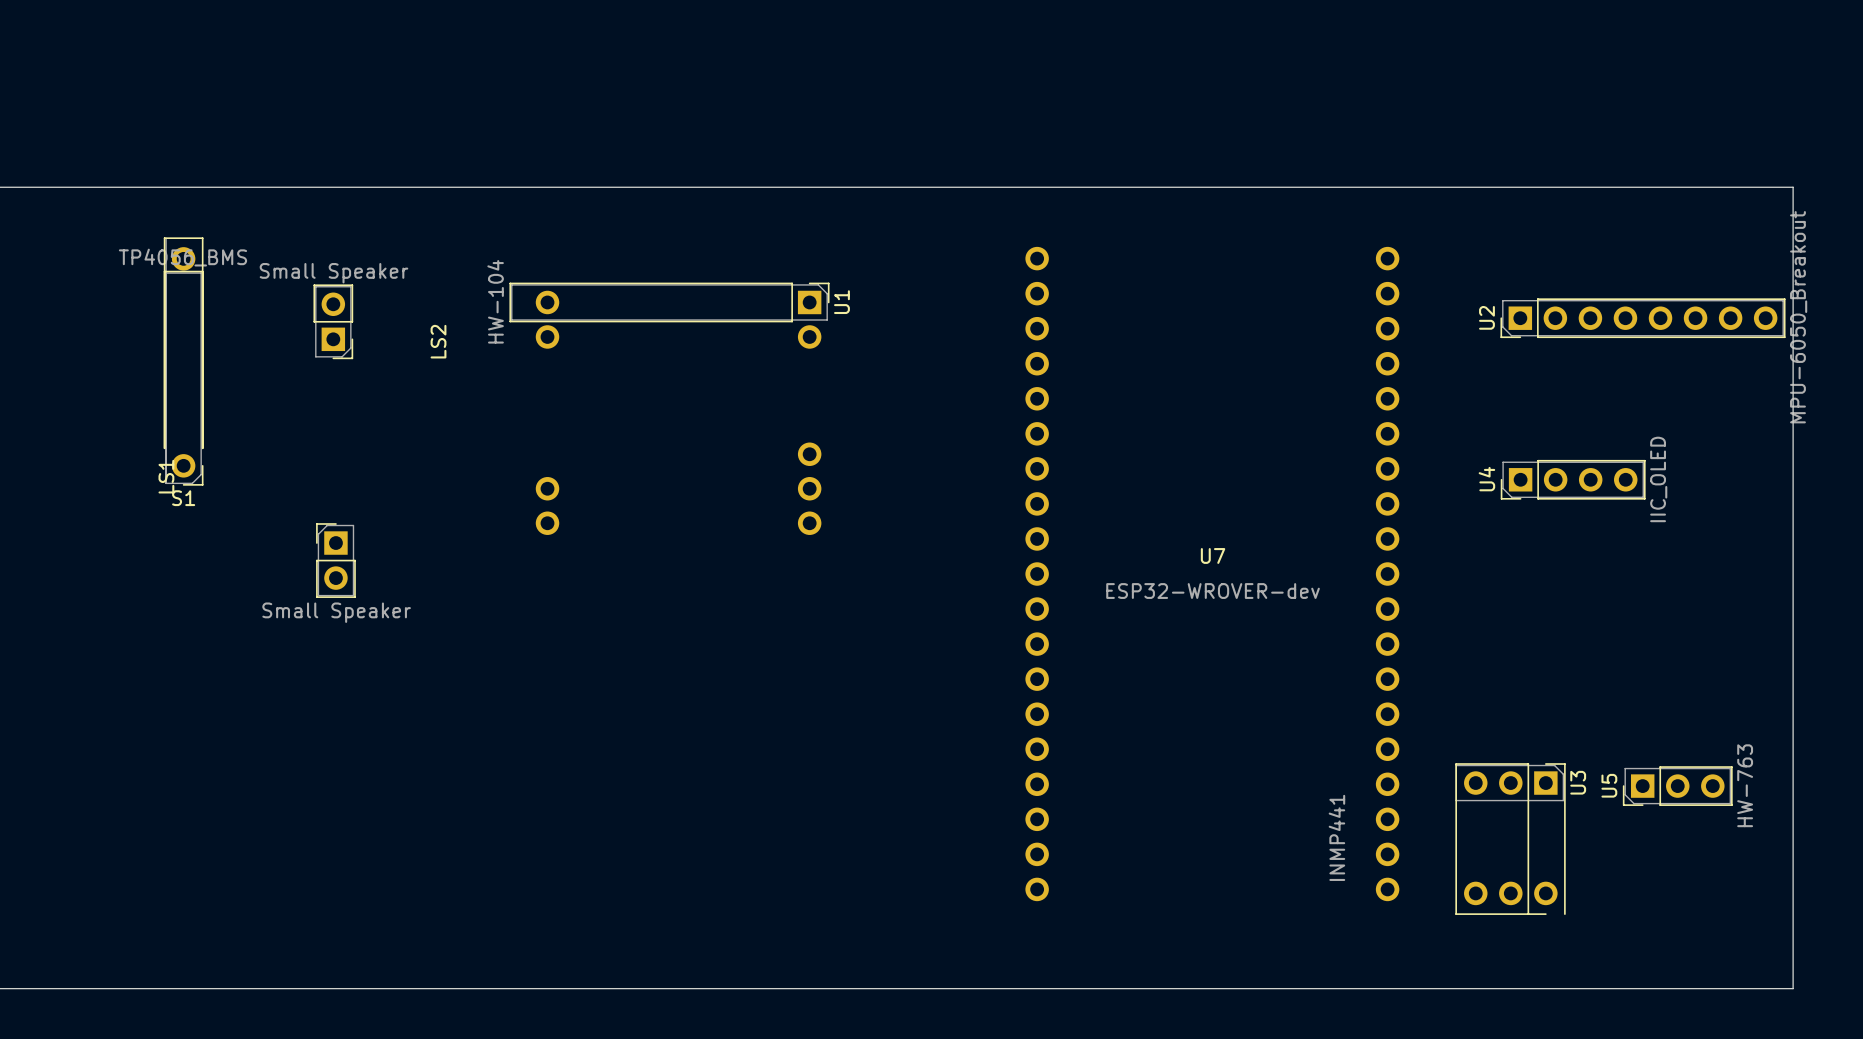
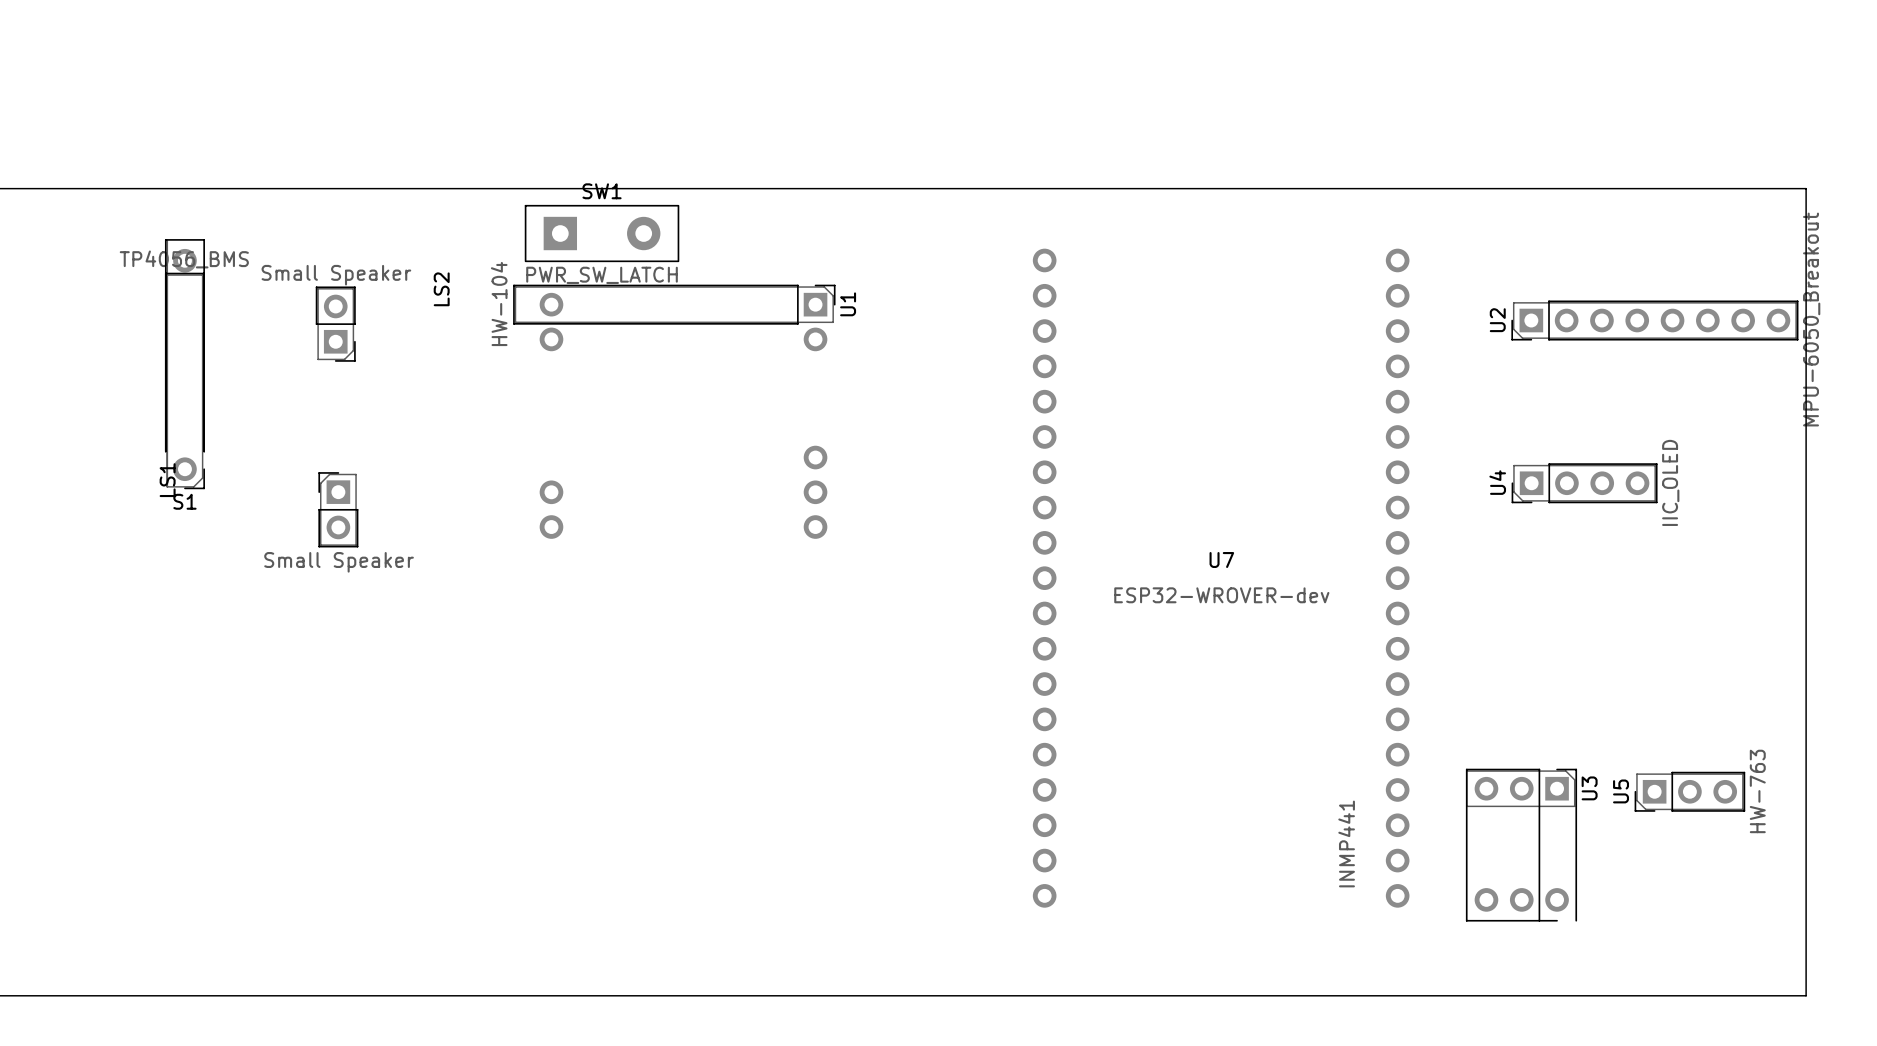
SW1: none -> PWR_SW_LATCH (602, 233)
LS2 position: (335, 560) -> (338, 509)

